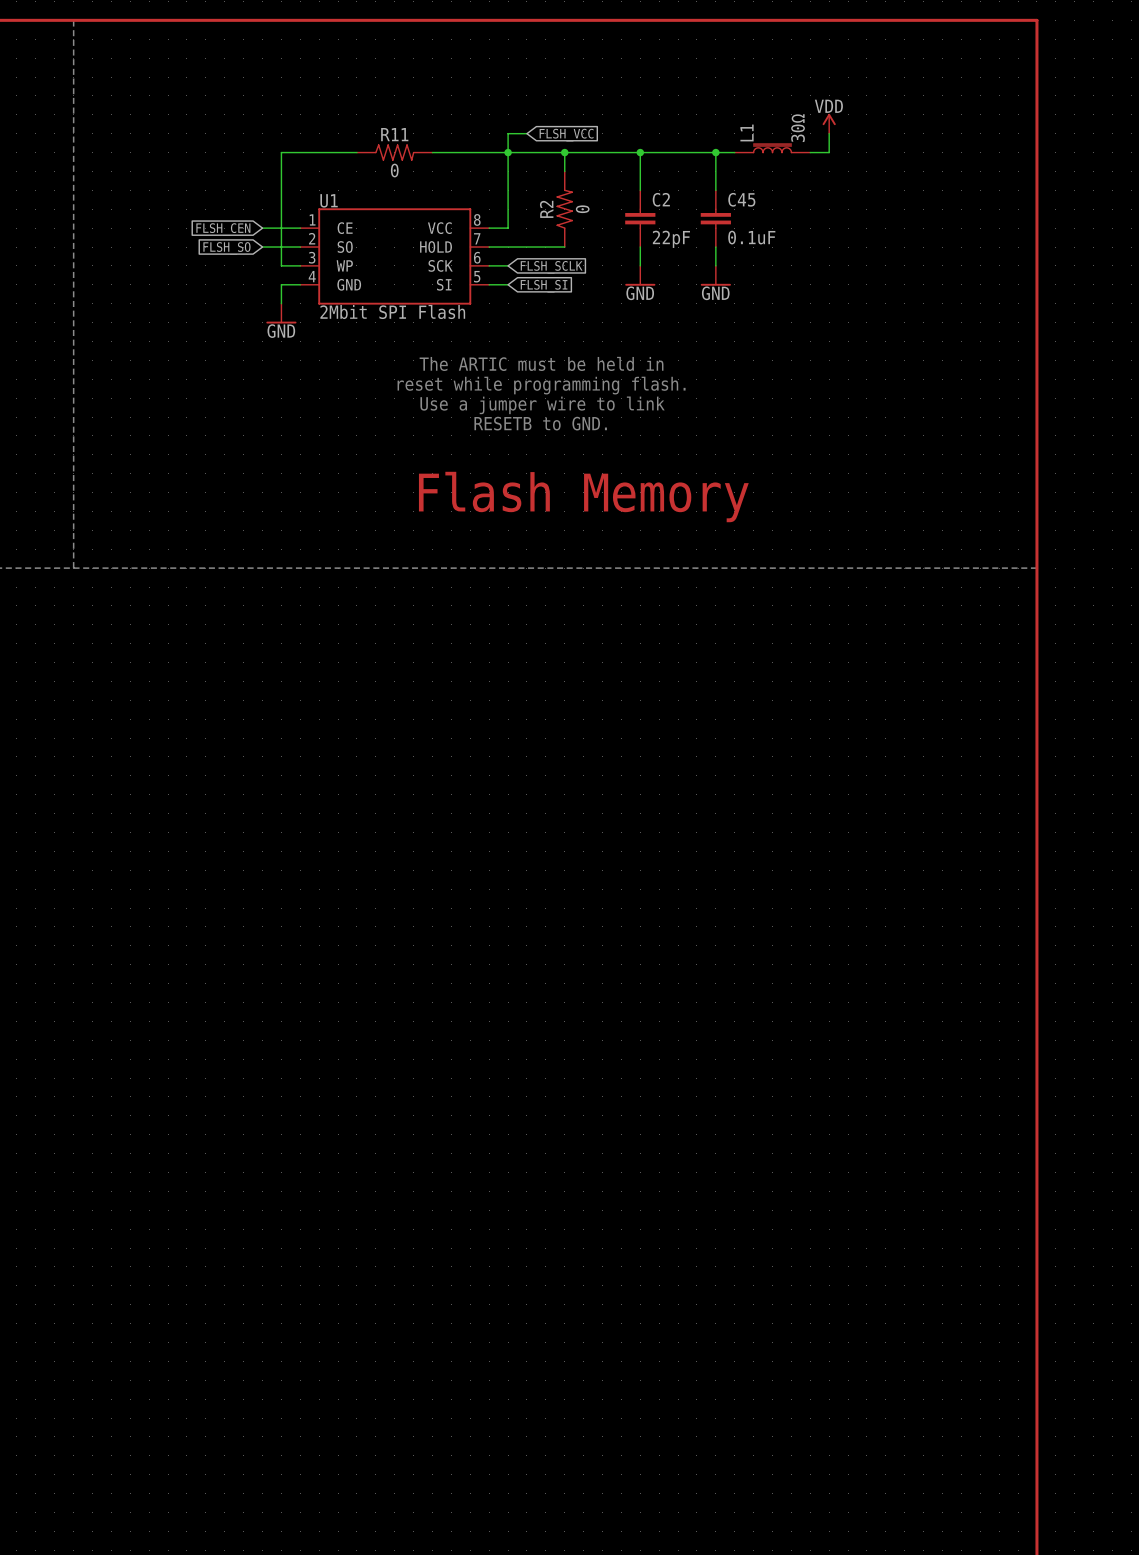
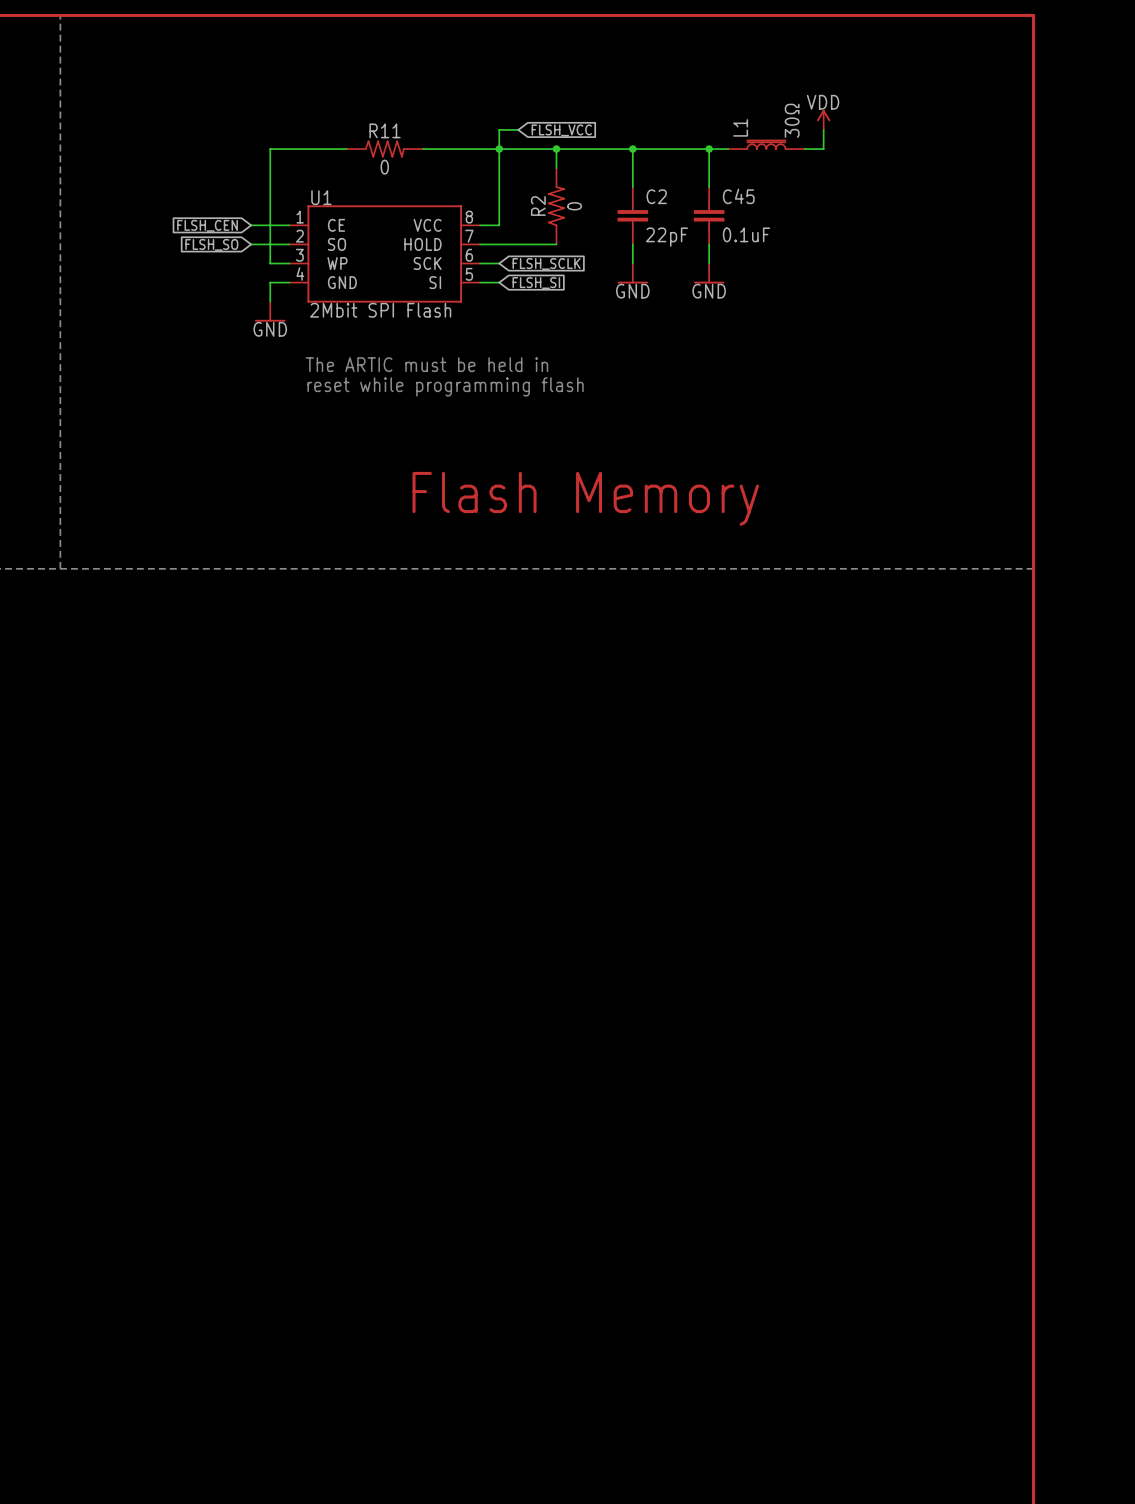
text: The ARTIC must be held in (541, 363) -> none
text: none -> The ARTIC must be held in (426, 364)
text: reset while programming flash. (541, 385) -> none
text: none -> reset while programming flash (445, 386)
text: Use a jumper wire to link (542, 405) -> none
text: RESETB to GND. (540, 423) -> none

